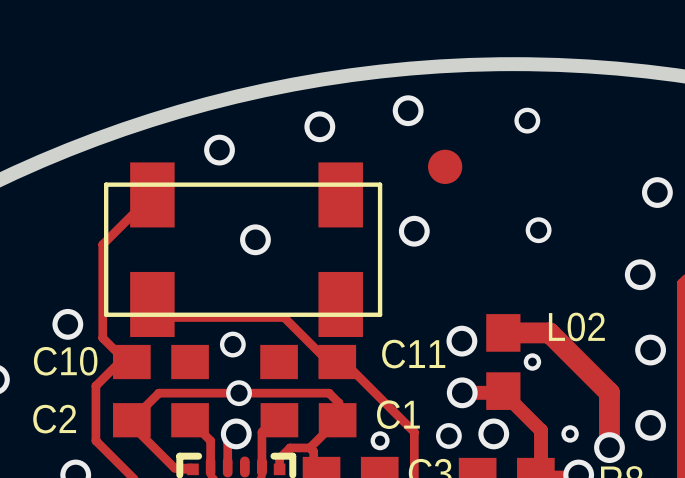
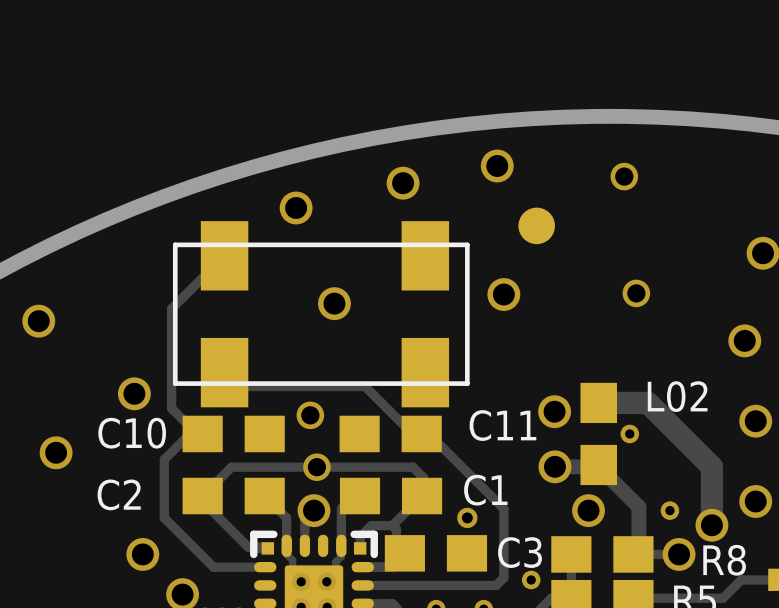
via: (448, 435) -> none

